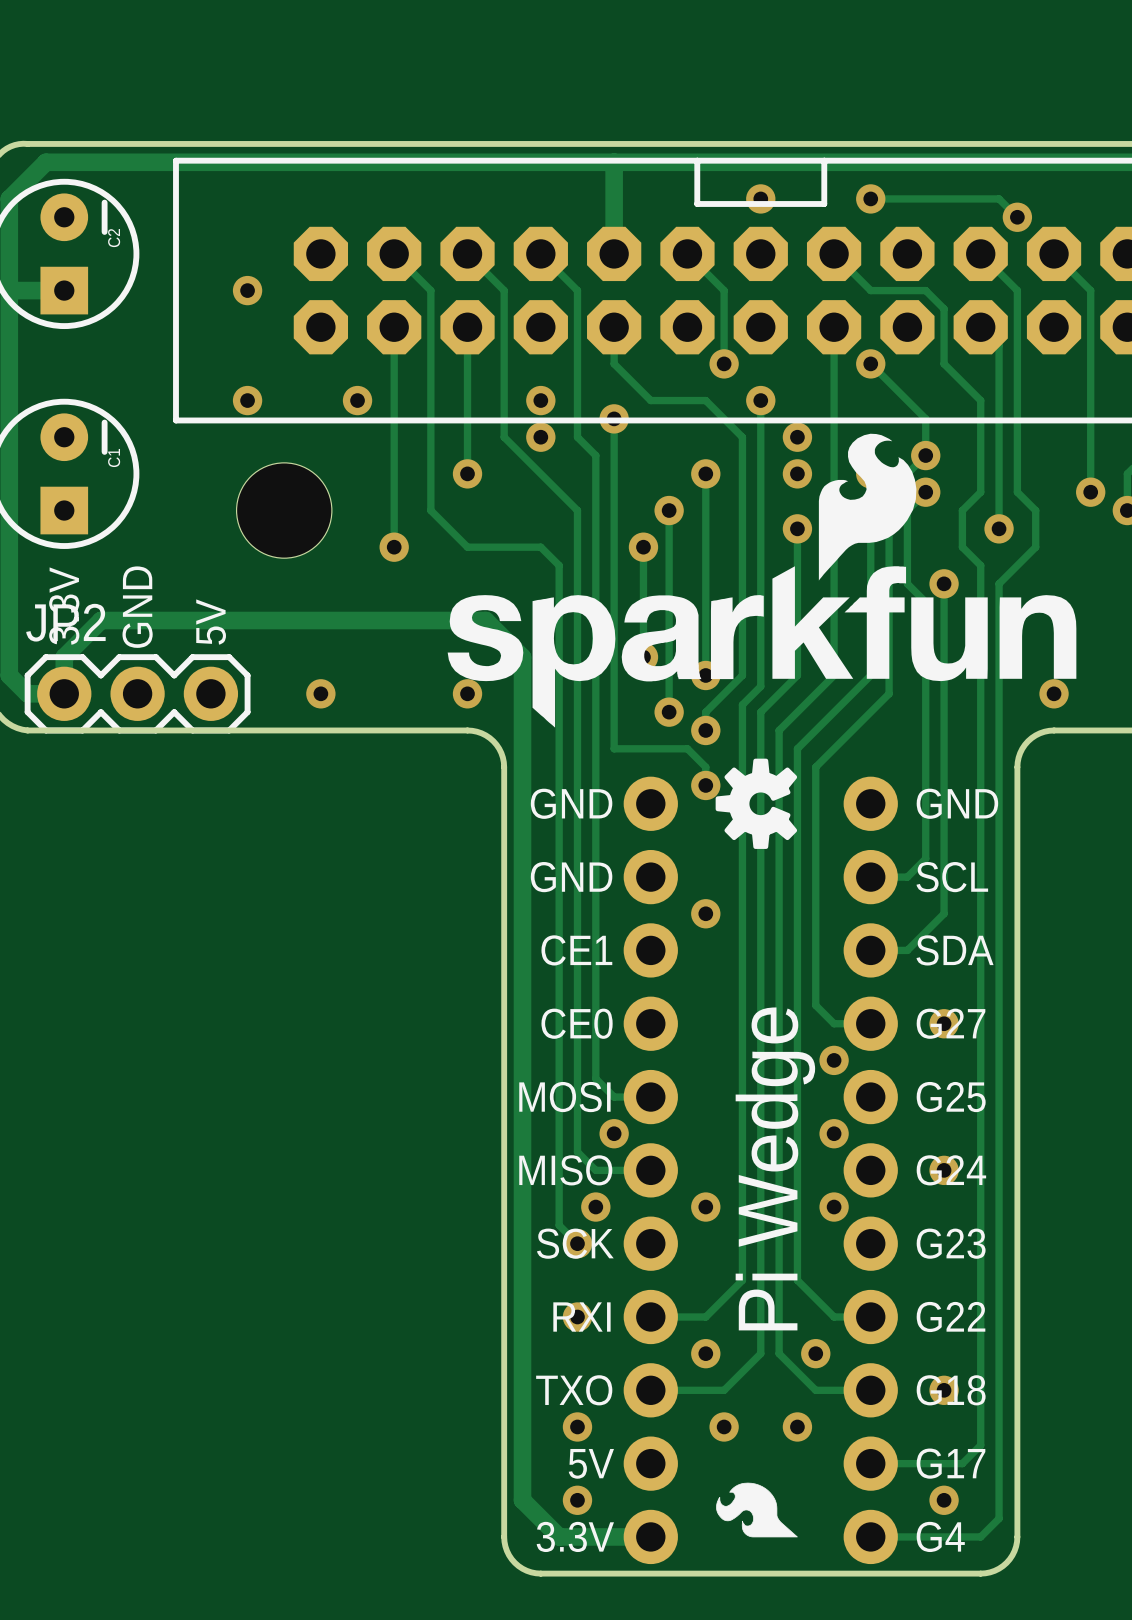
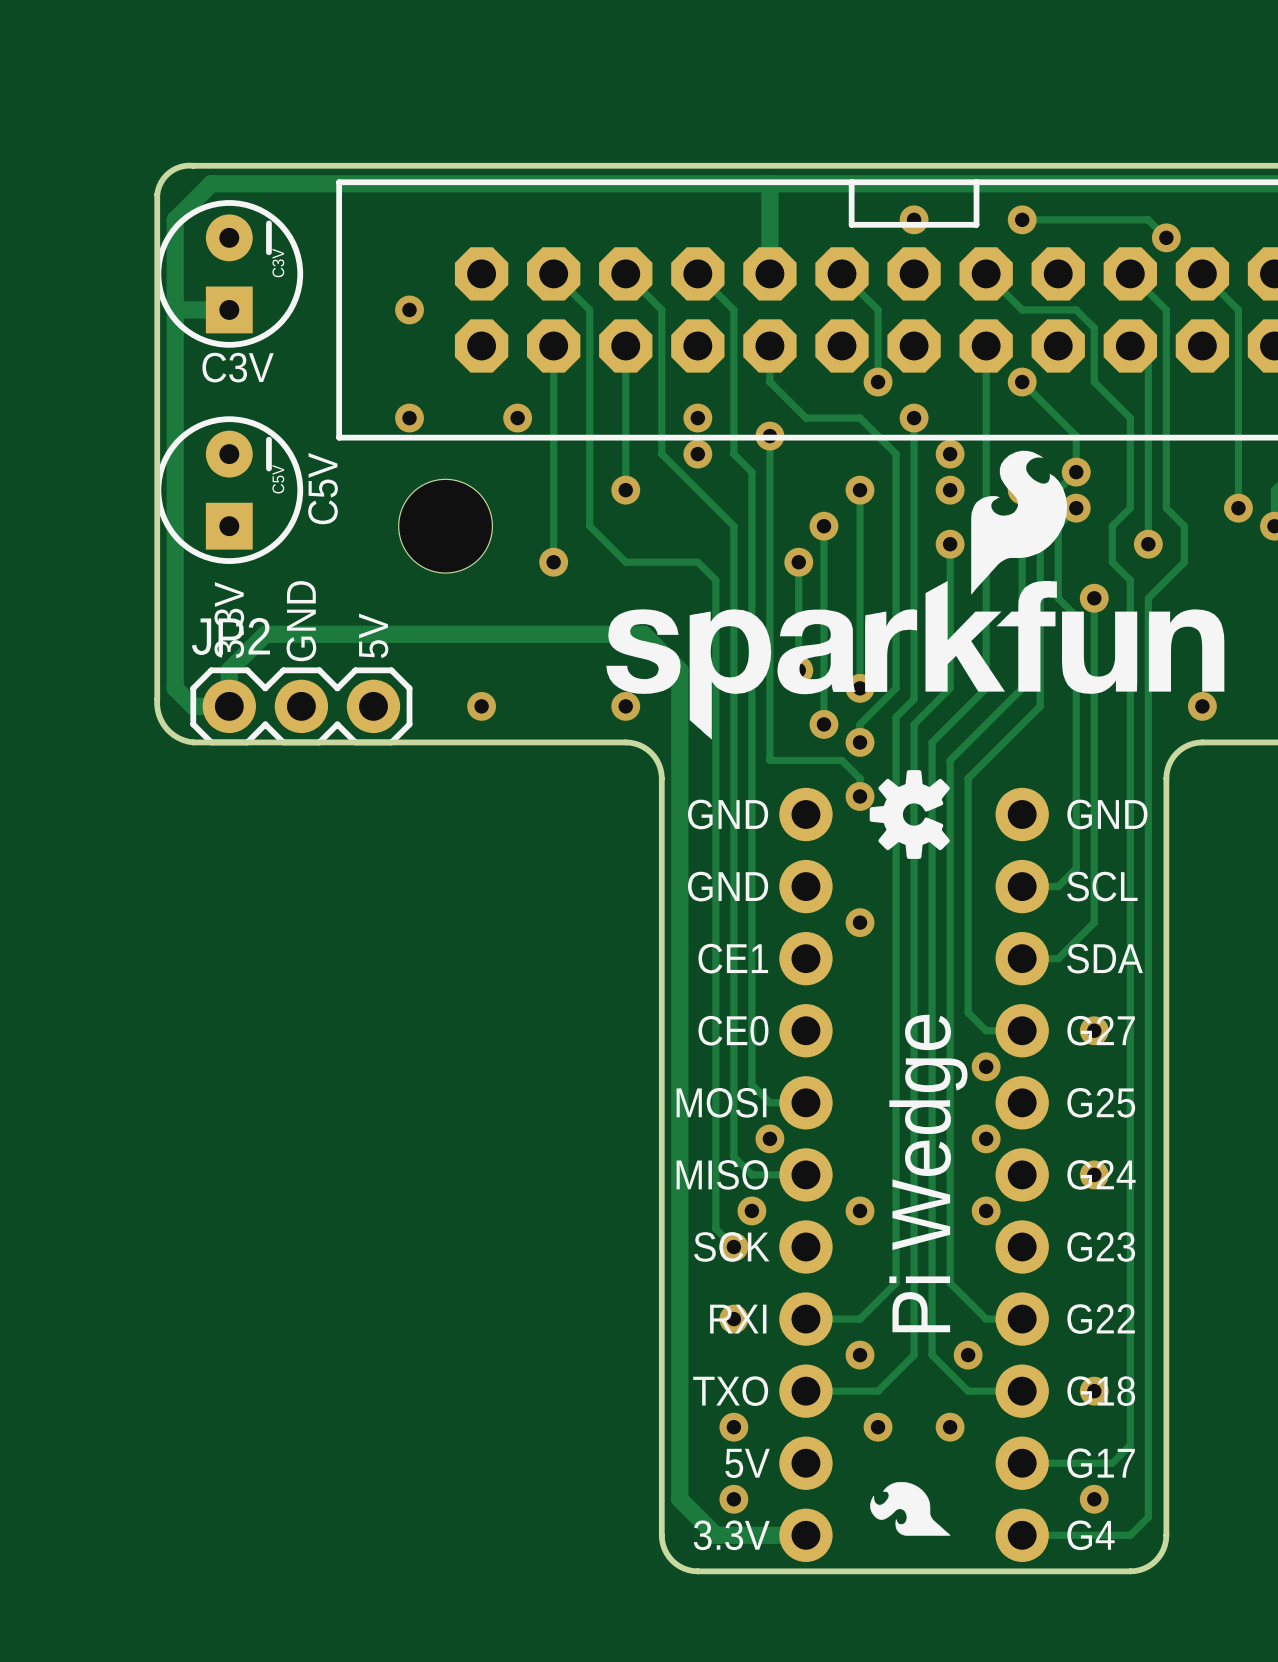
C2 name: C2 (114, 238) -> C3V (278, 262)
text: none -> C3V (238, 367)
C1 name: C1 (114, 458) -> C5V (278, 479)
text: none -> C5V (323, 488)

